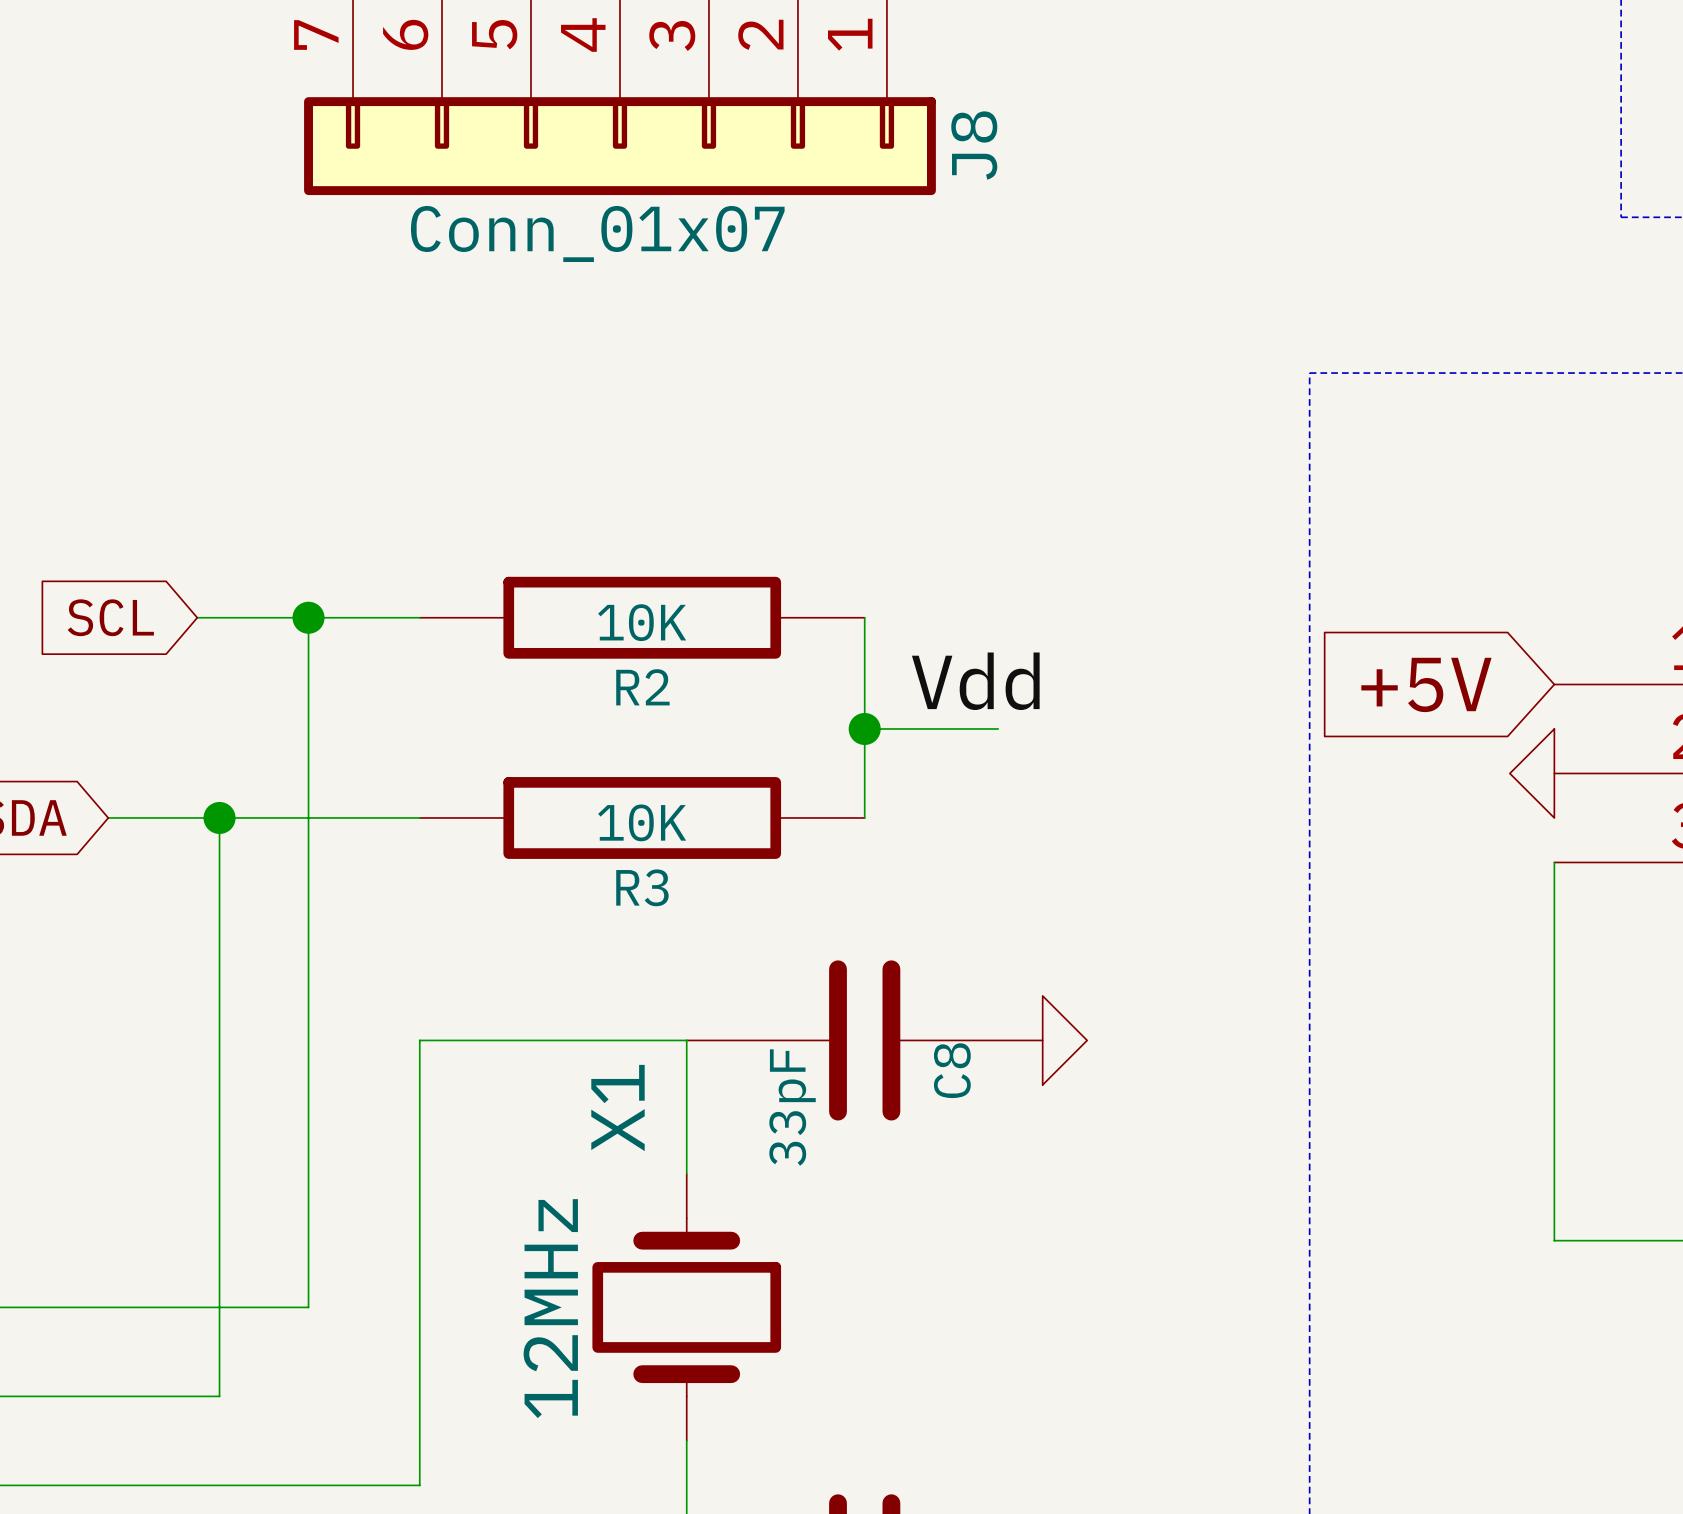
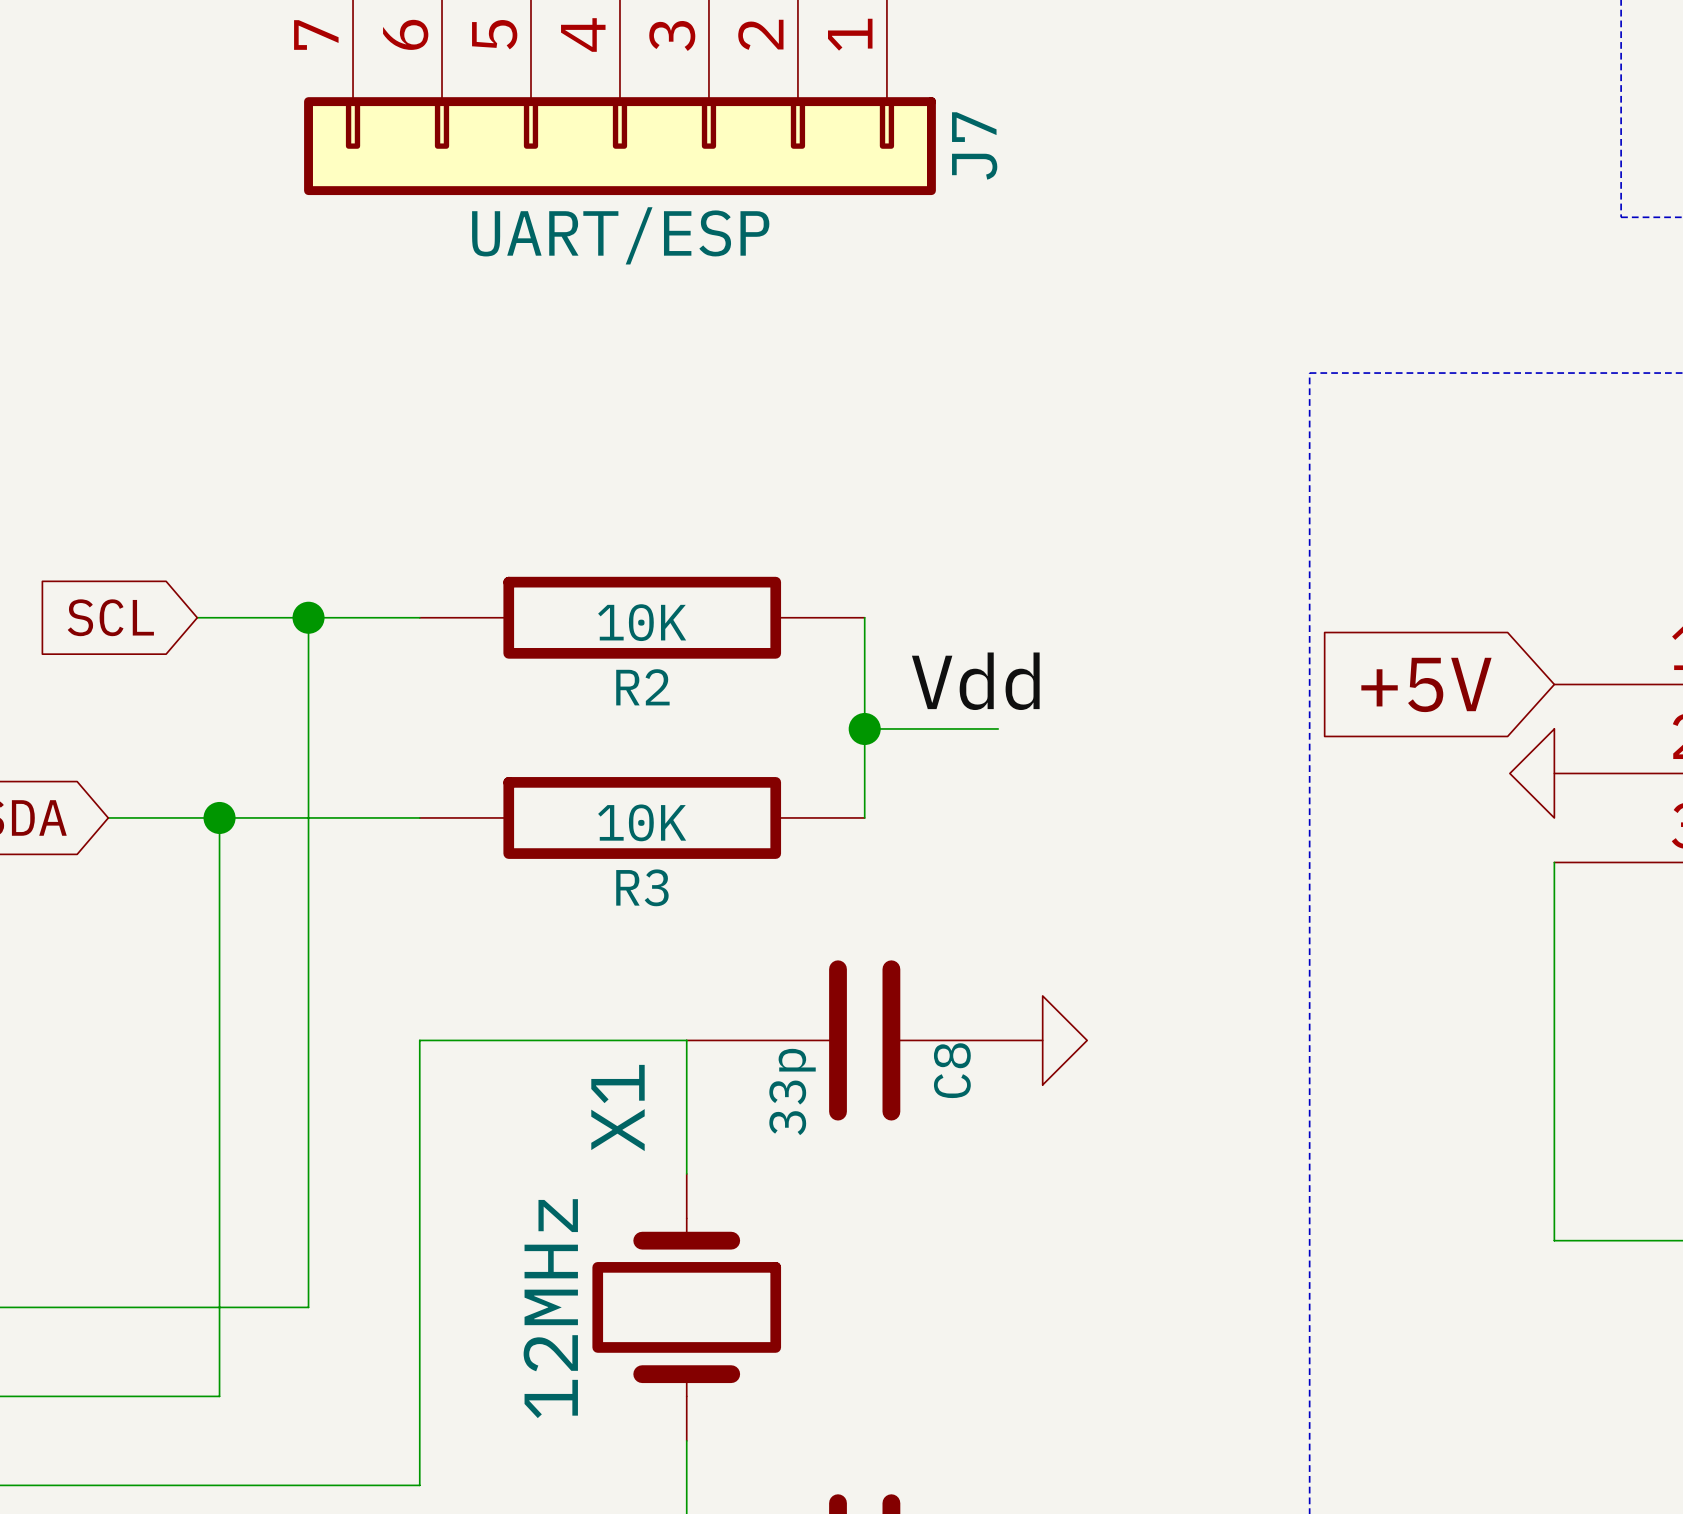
J8 name: J8 (974, 145) -> J7 (974, 145)
J8 value: Conn_01x07 (597, 233) -> UART/ESP (620, 235)
C8 value: 33pF (792, 1107) -> 33p (792, 1091)

